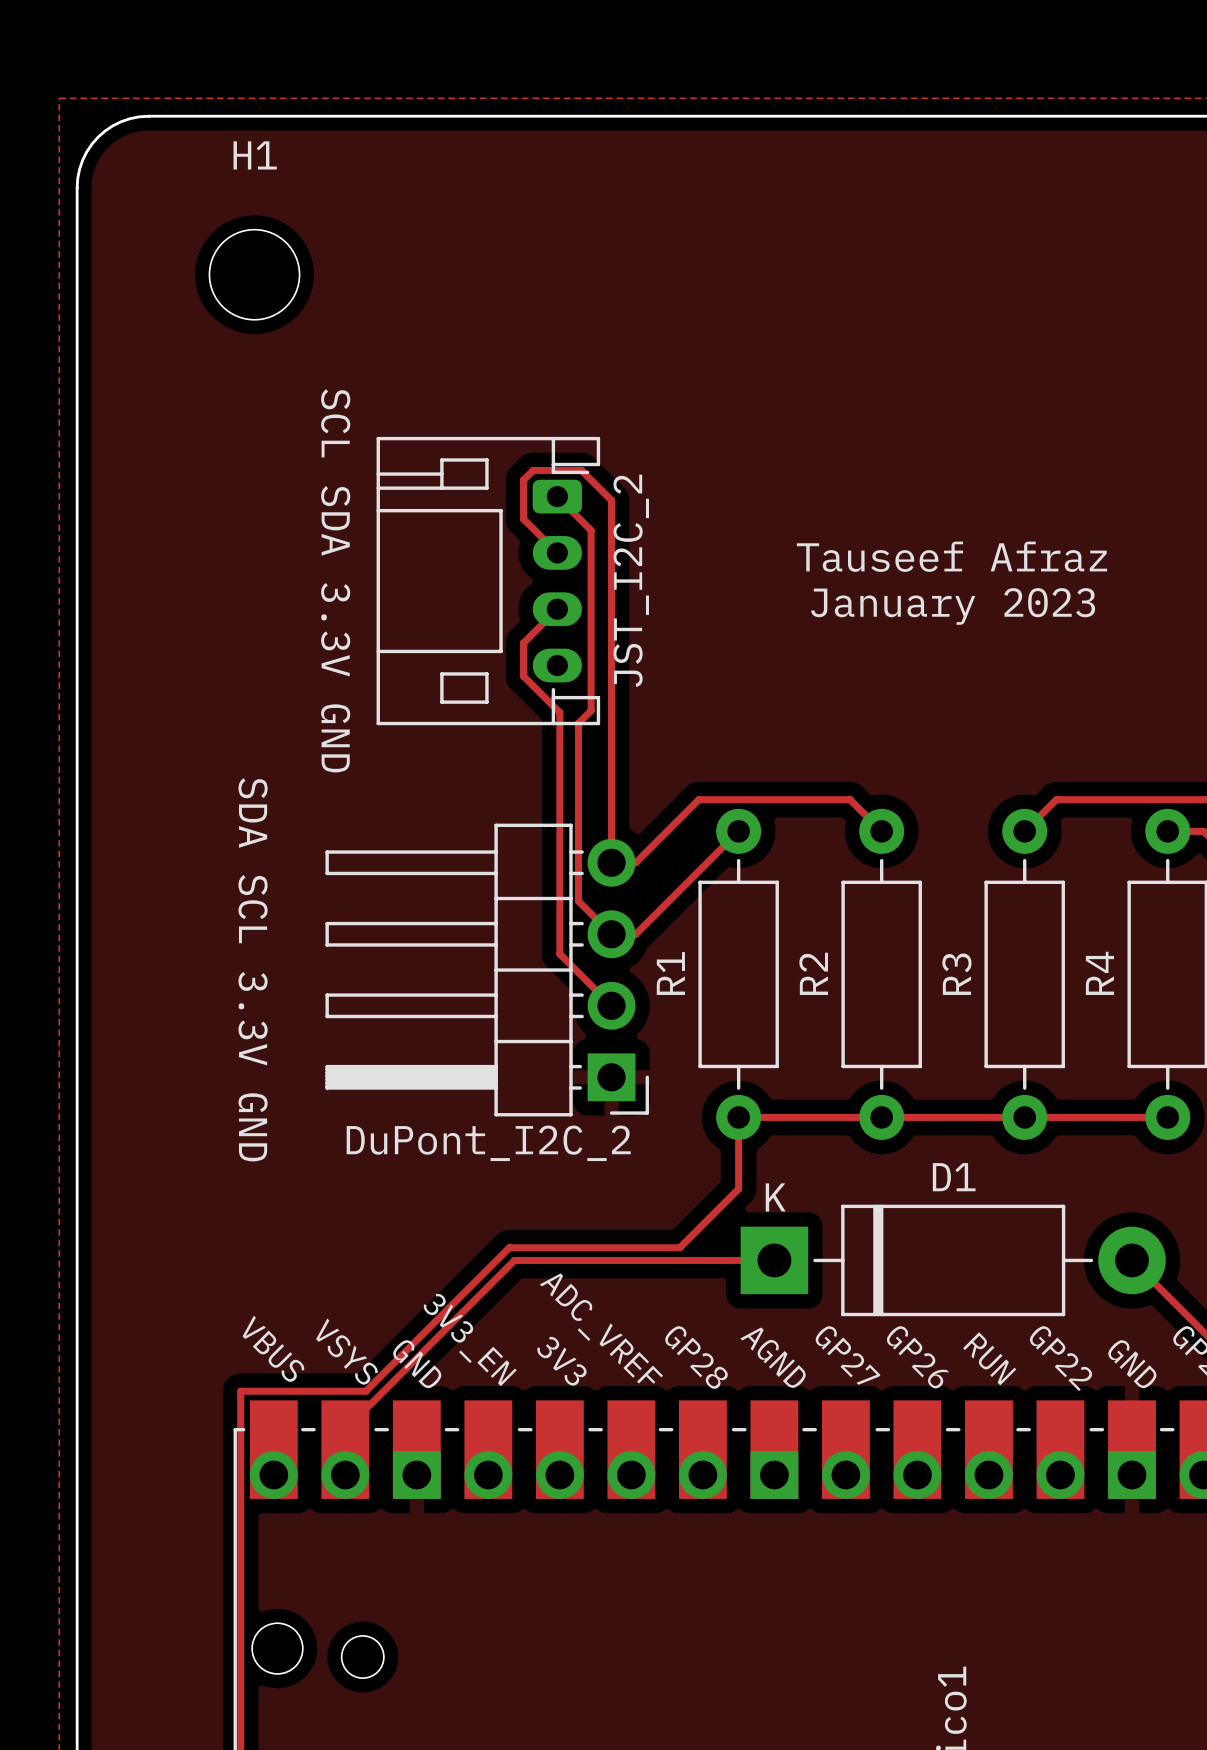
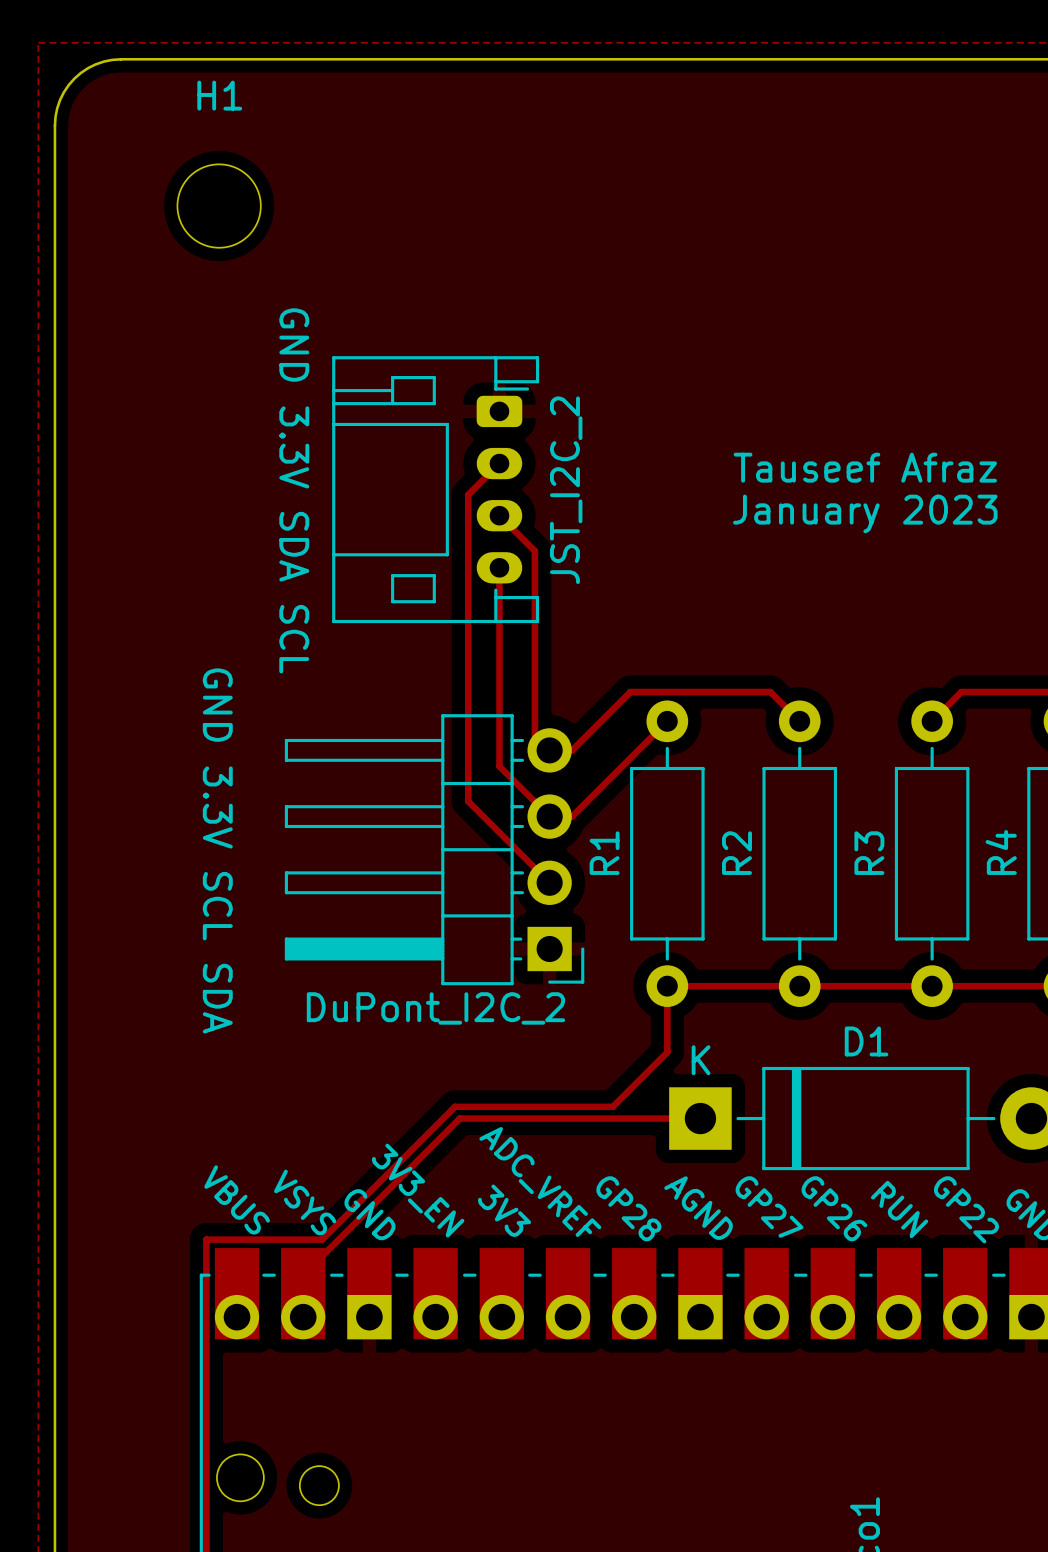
track: (557, 496) (591, 530) (591, 710) (578, 723) (578, 901) -> (499, 567) (499, 766) (519, 785)
track: (557, 552) (523, 519) (523, 480) (533, 470) (581, 470) (611, 500) (611, 862) -> (499, 515) (534, 551) (534, 735) (549, 750)
text: SCL SDA 3.3V GND (335, 580) -> GND 3.3V SDA SCL (294, 490)
track: (557, 609) (523, 643) -> (499, 463) (468, 494) (468, 546)
track: (523, 676) (559, 712) (559, 954) -> (468, 577) (468, 801) (501, 834)
text: SDA SCL 3.3V GND (253, 969) -> GND 3.3V SCL SDA (217, 850)

